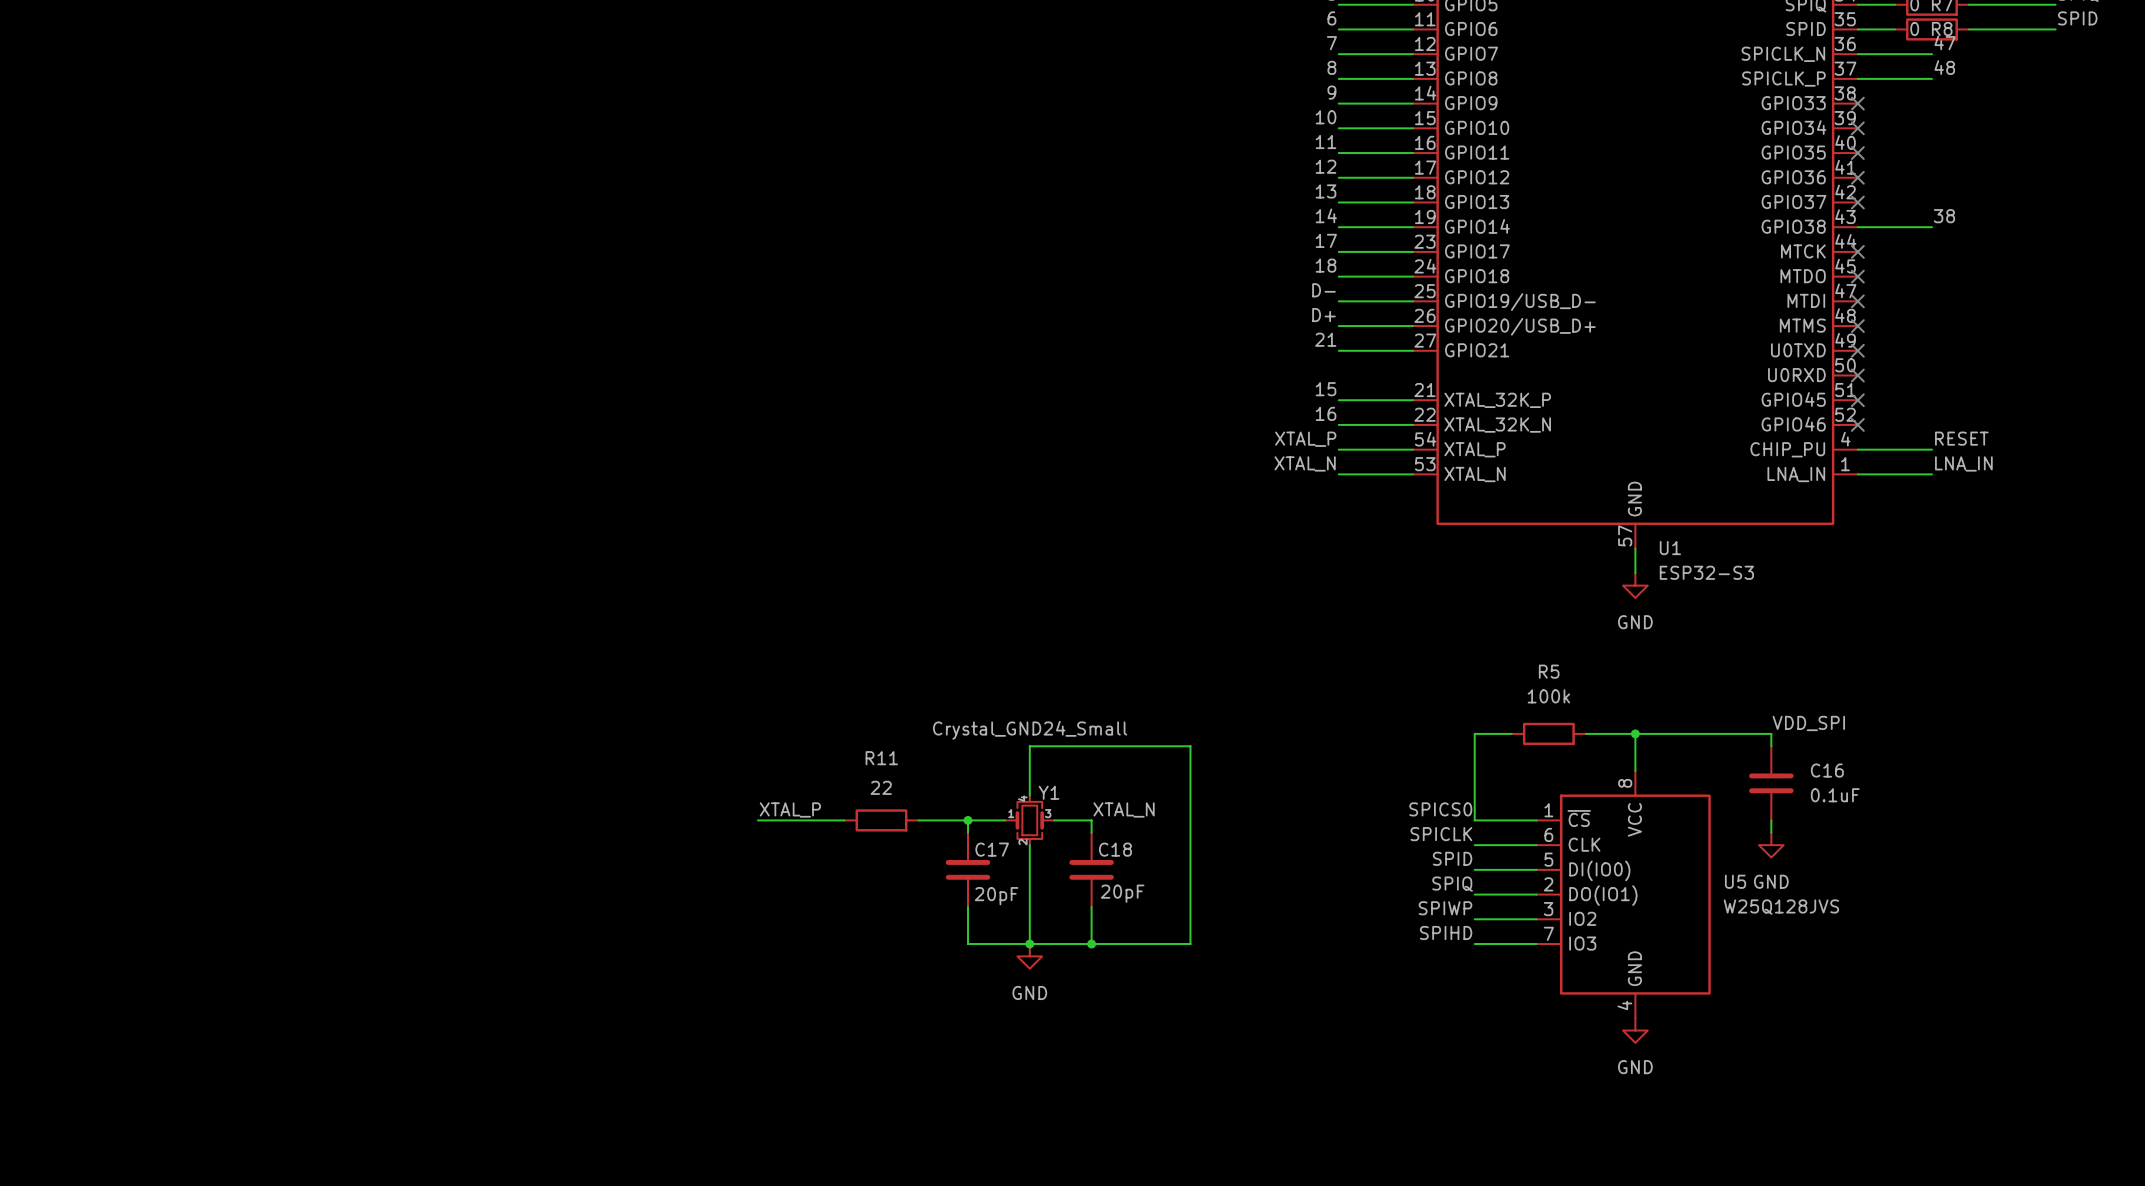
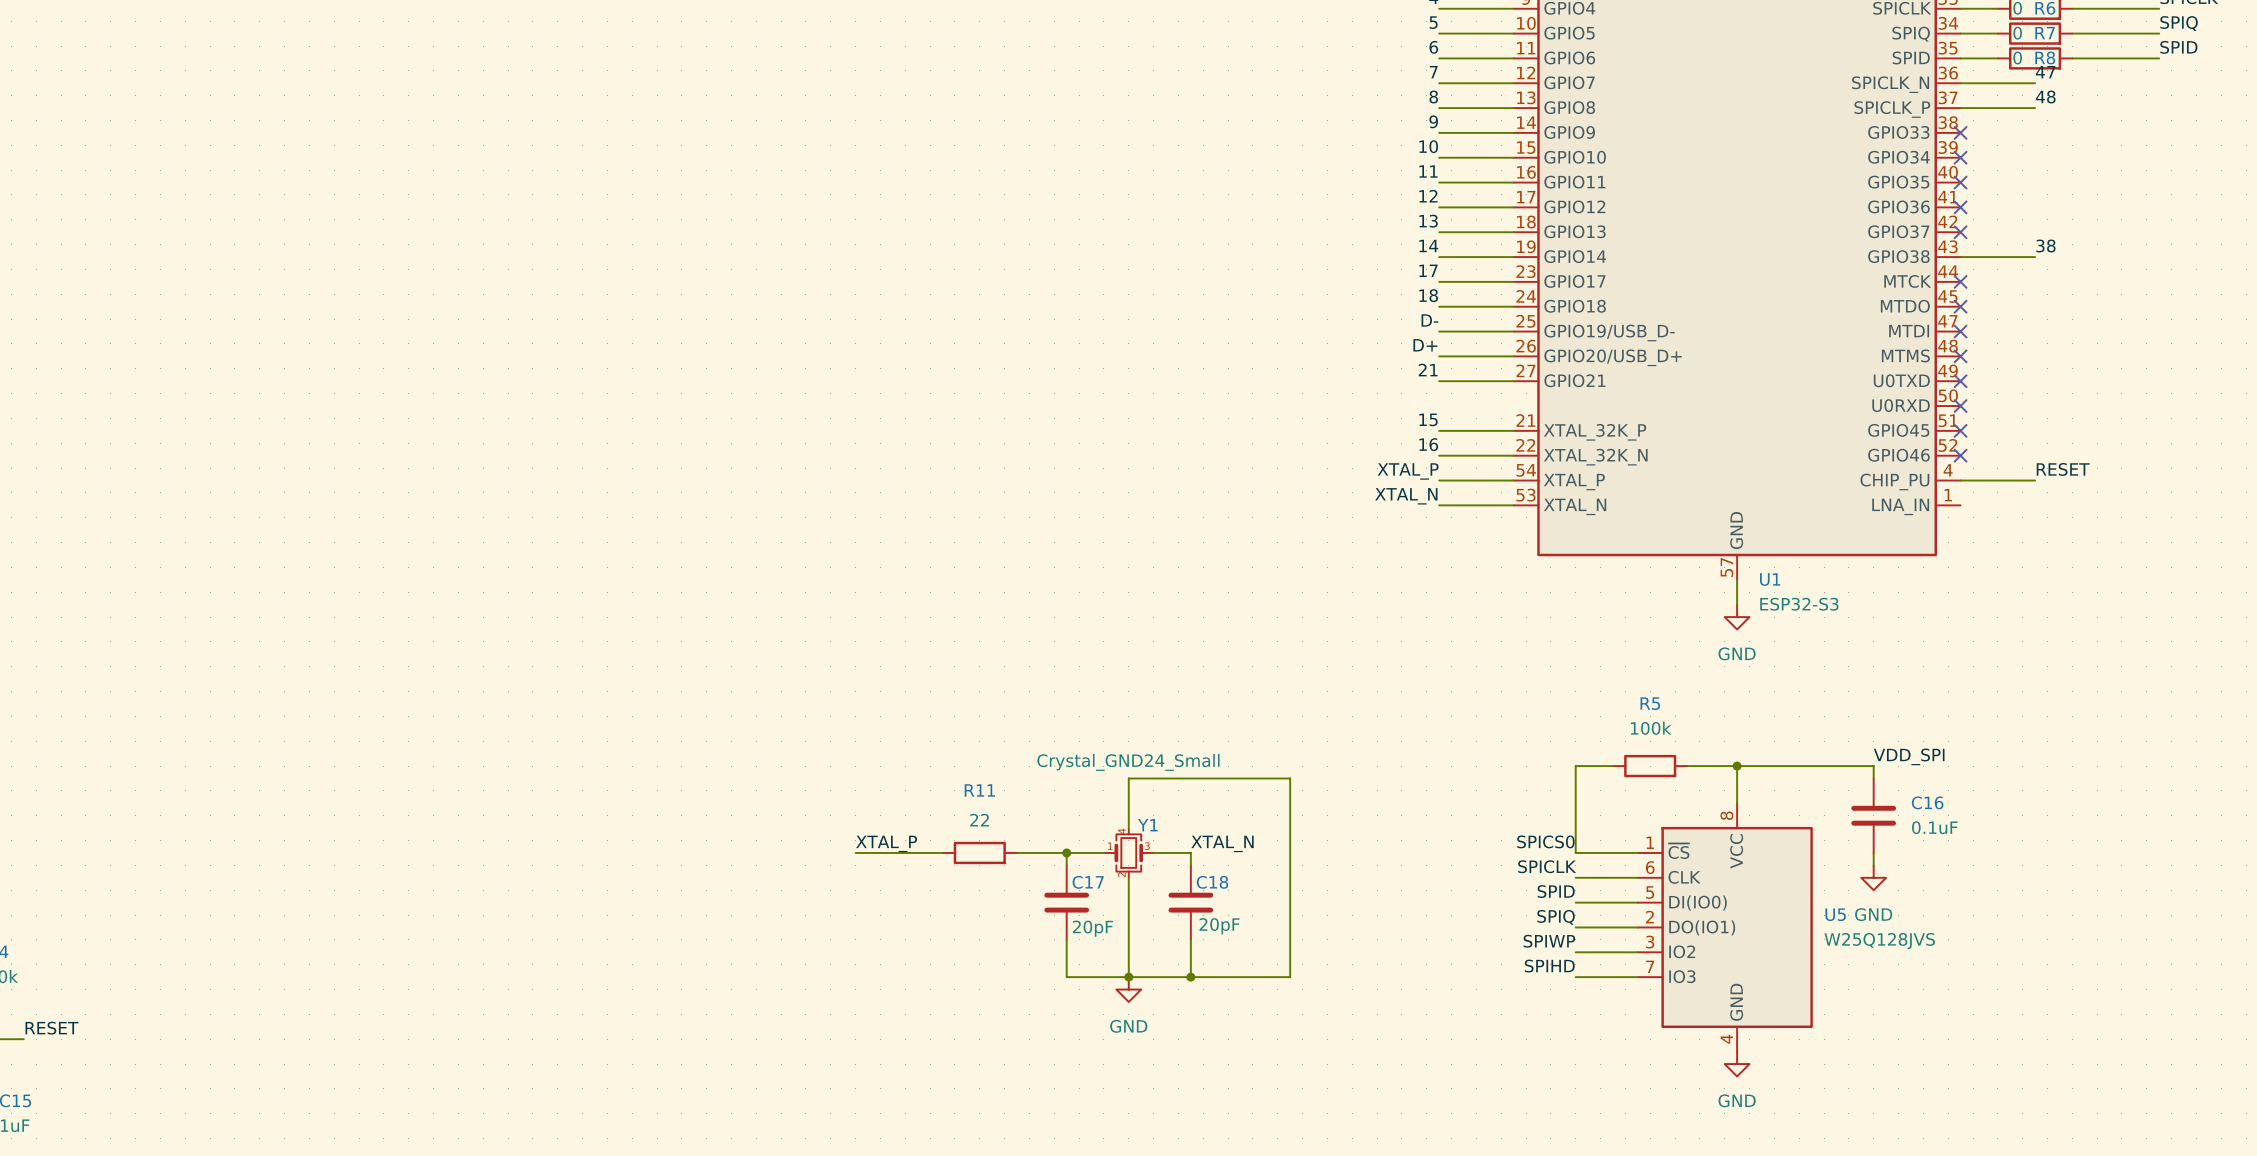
label: LNA_IN (1963, 463) -> none
wire: (1857, 474) (1932, 474) -> none

